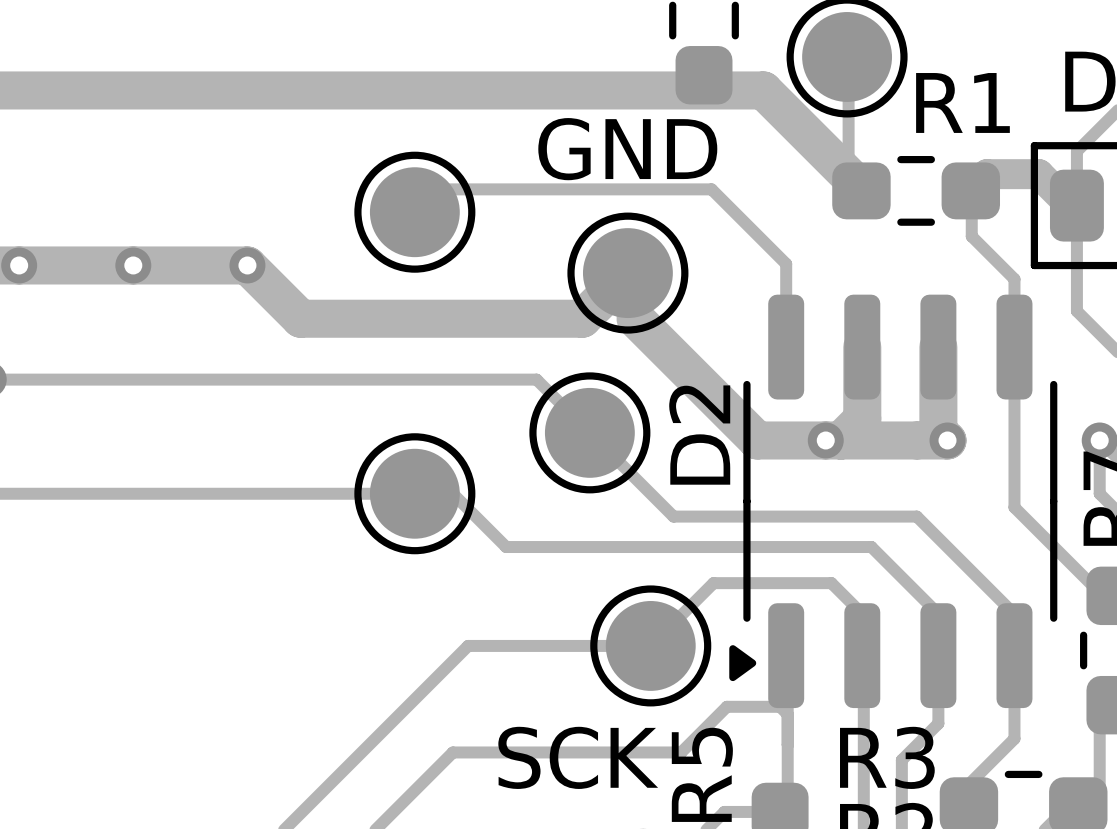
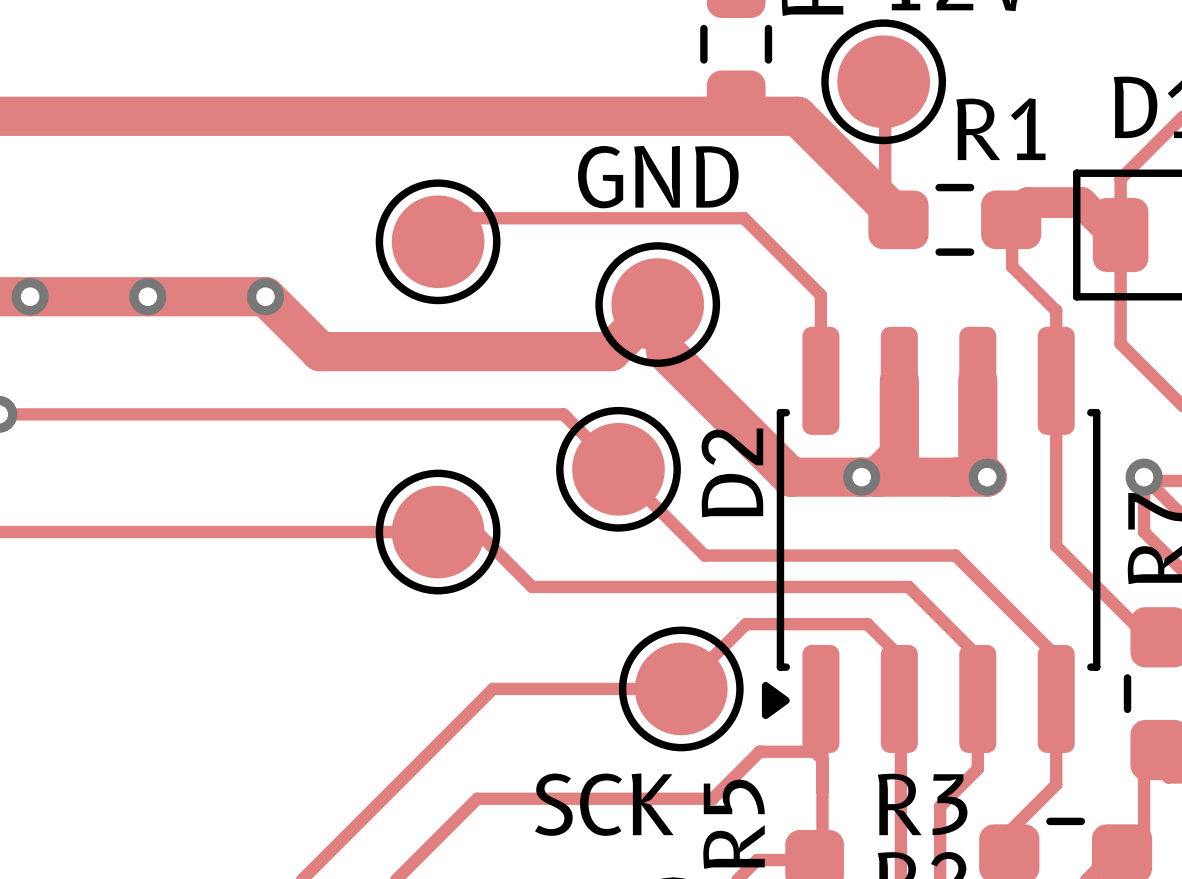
D2 footprint: [729, 294, 1058, 709] -> [761, 326, 1101, 754]

